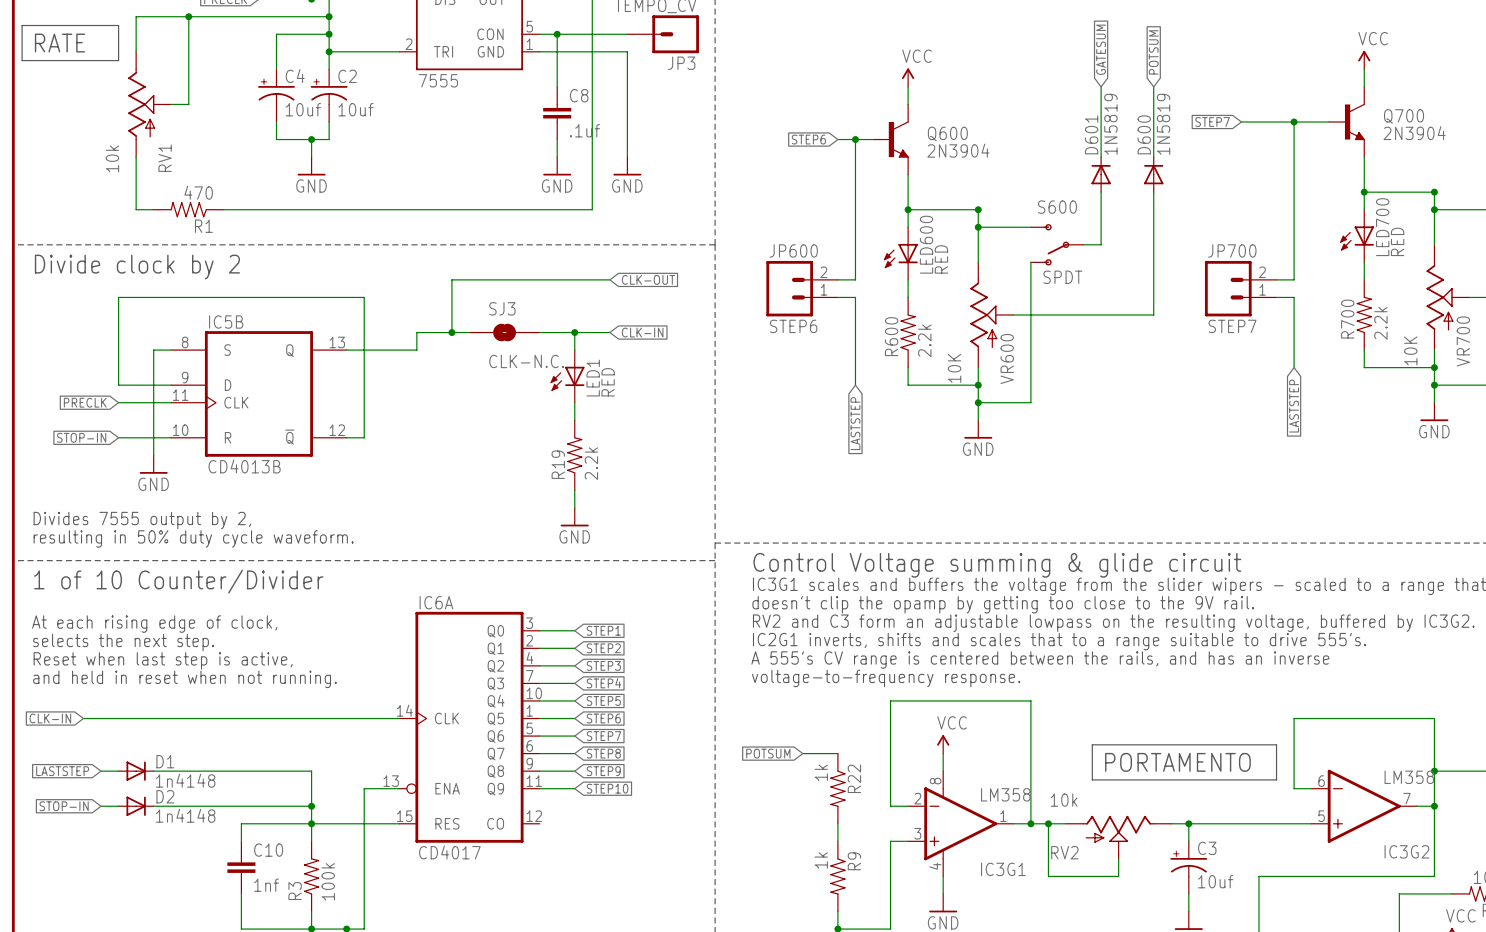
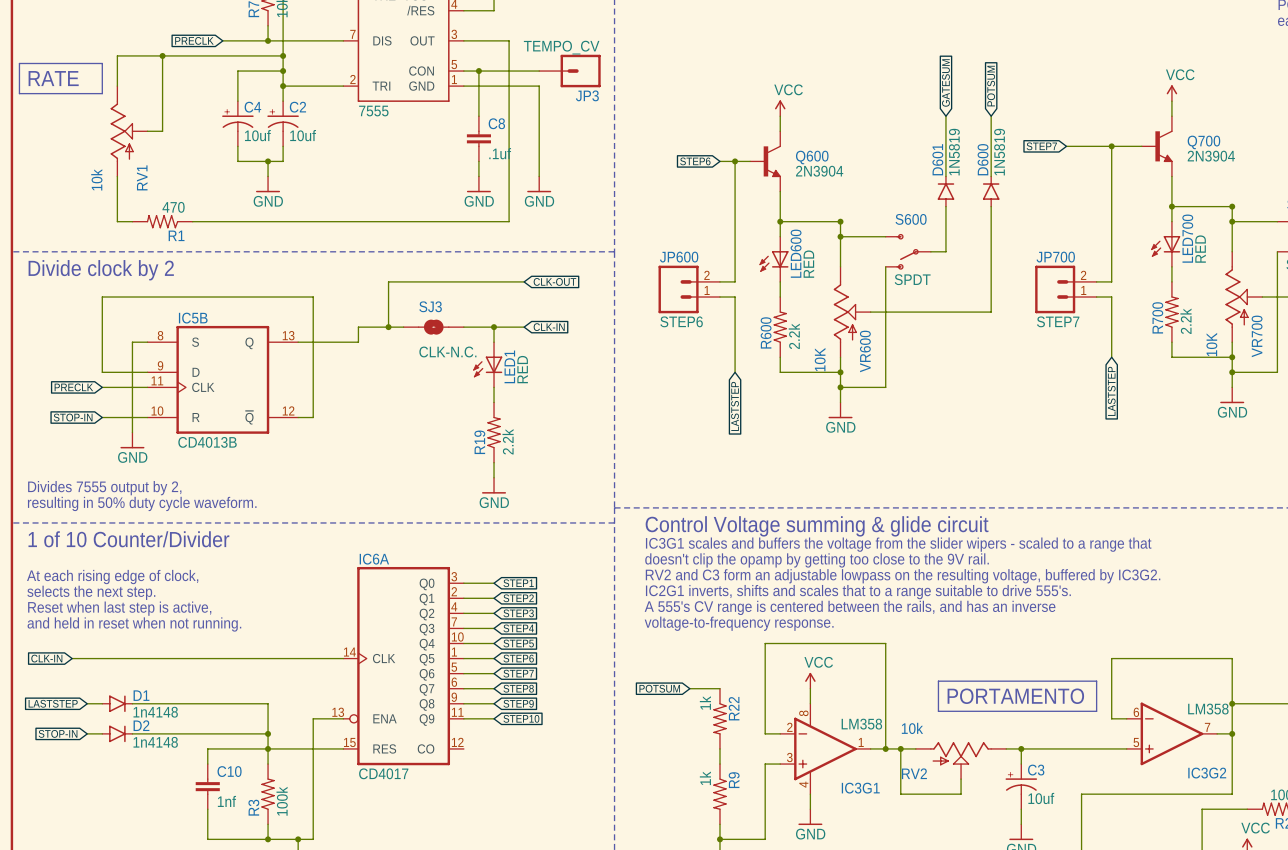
D601 symbol: [1091, 157, 1111, 193] -> [937, 176, 955, 208]
D600 symbol: [1144, 157, 1164, 193] -> [982, 176, 1000, 208]
D1 symbol: [118, 761, 154, 781] -> [101, 695, 133, 713]
D2 symbol: [118, 796, 154, 816] -> [101, 725, 133, 743]

